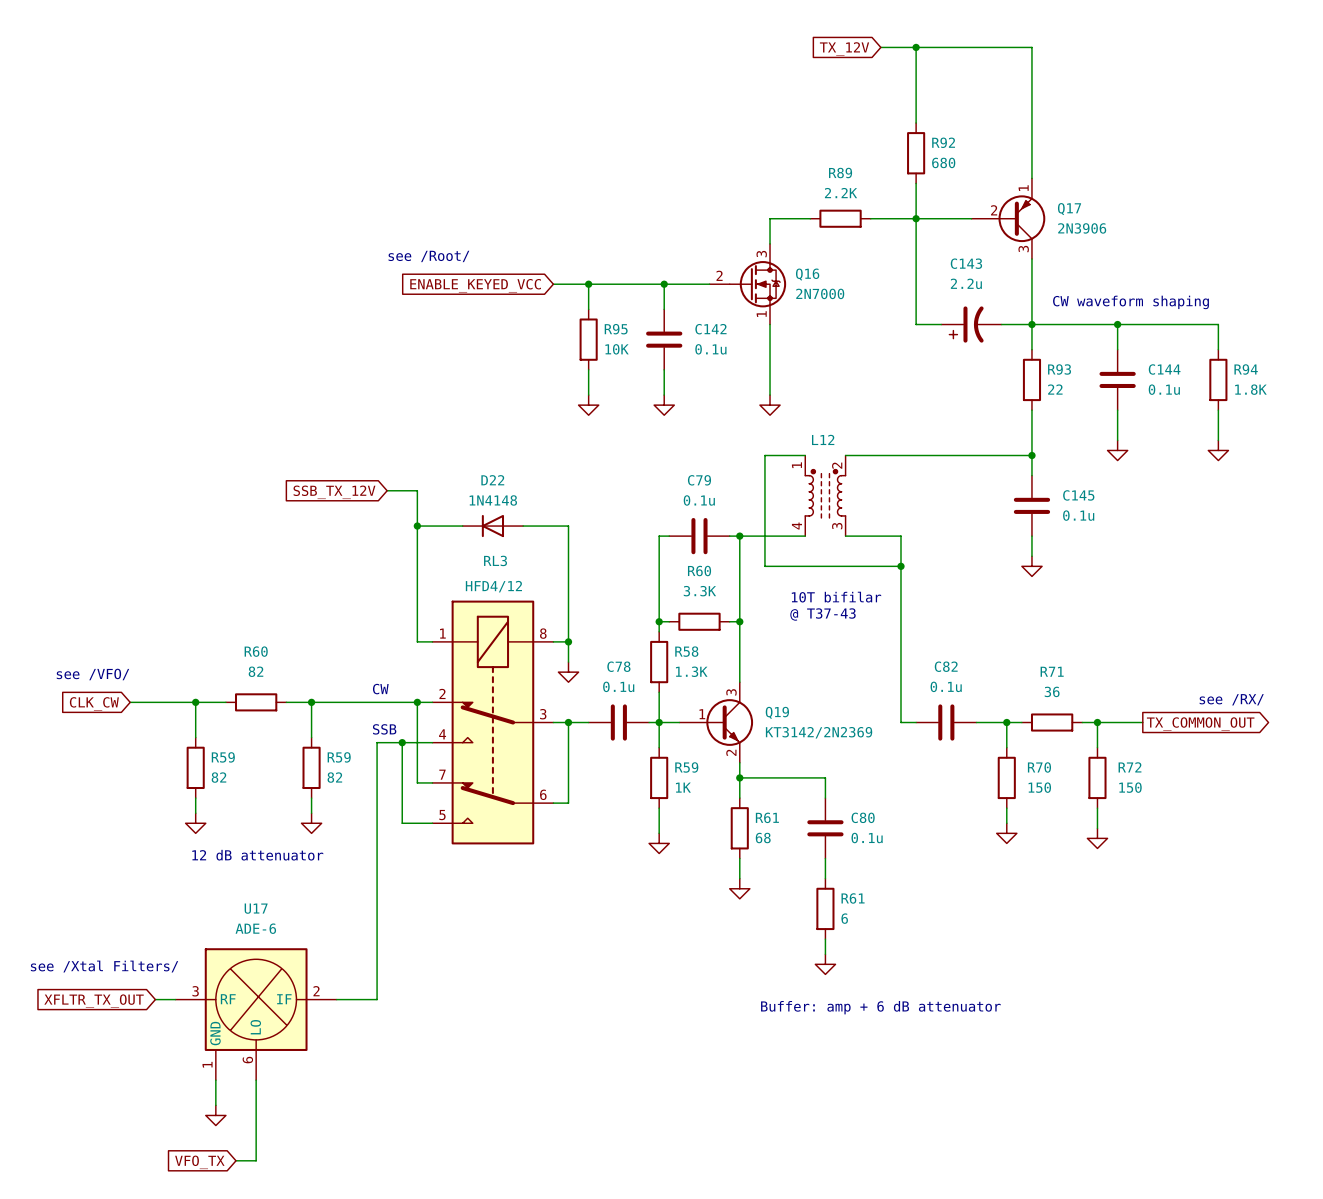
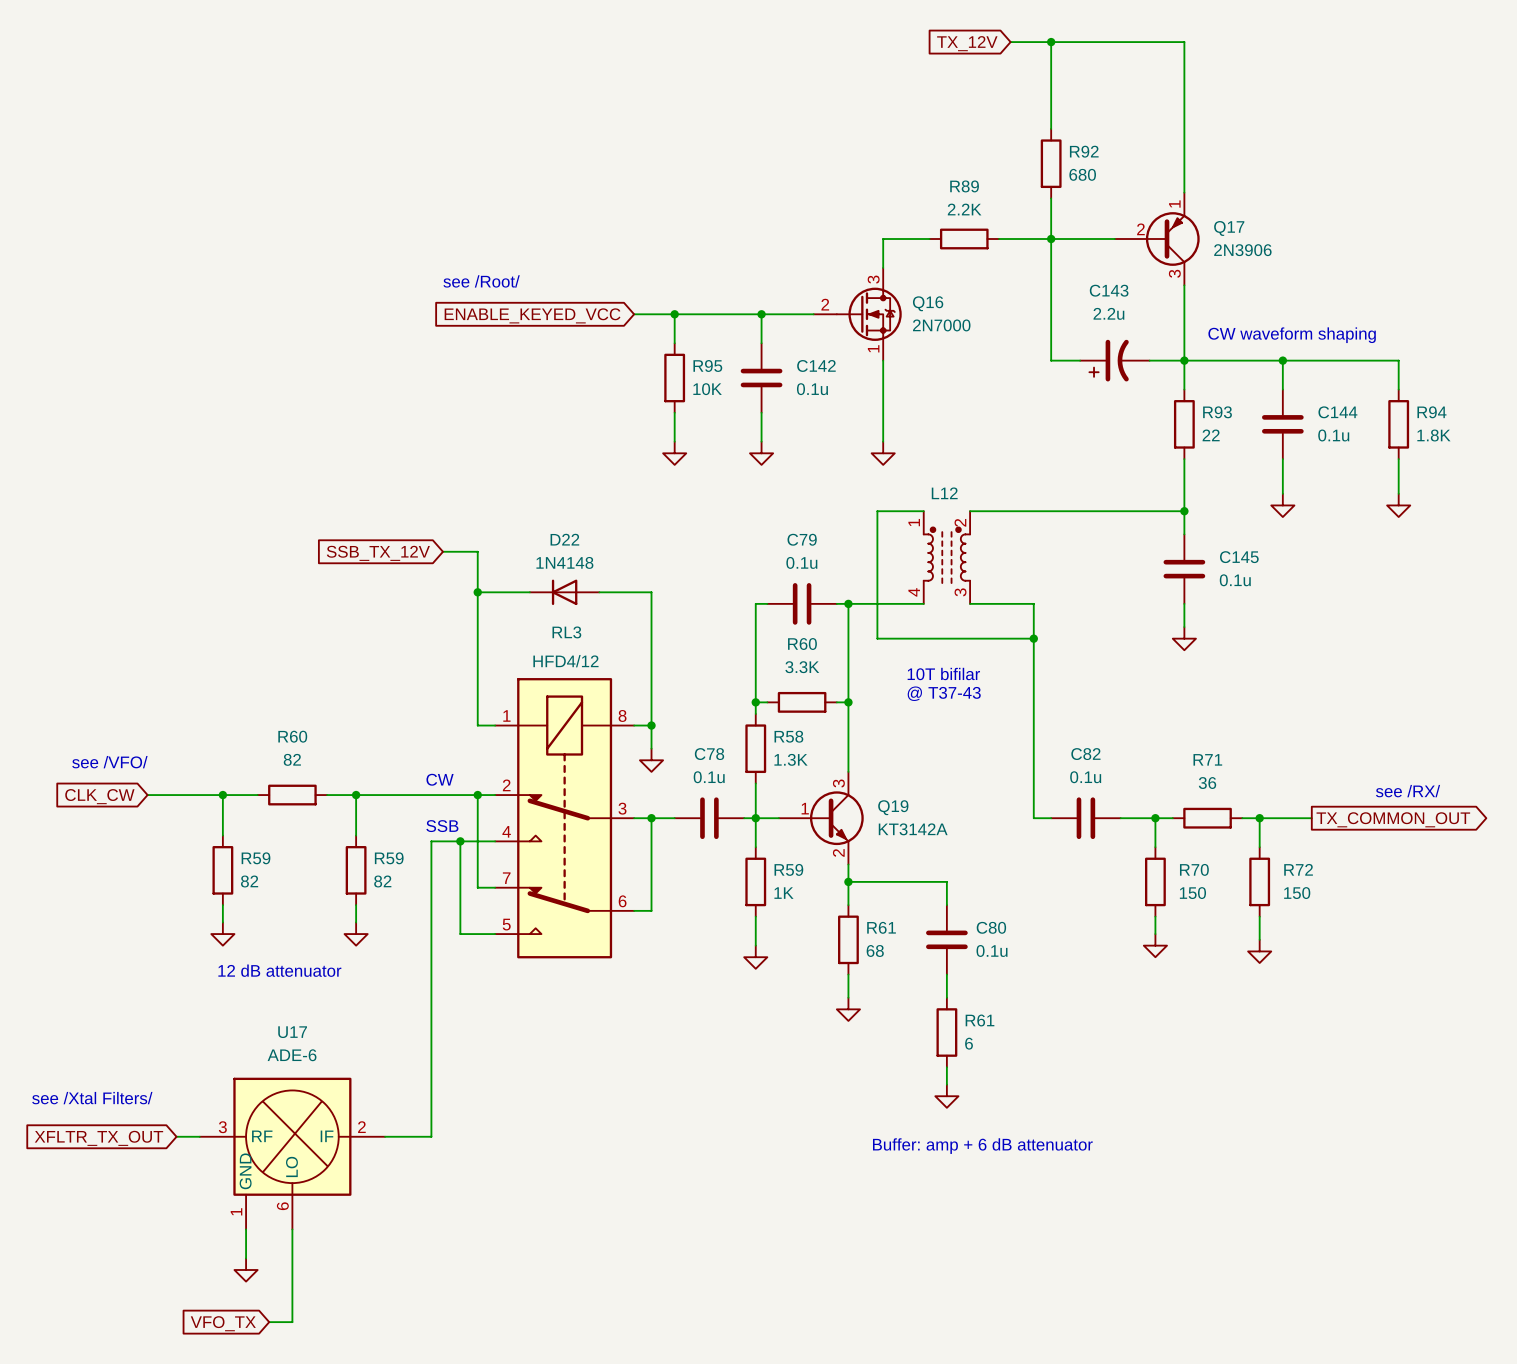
Q19 value: KT3142/2N2369 (819, 732) -> KT3142A (913, 829)

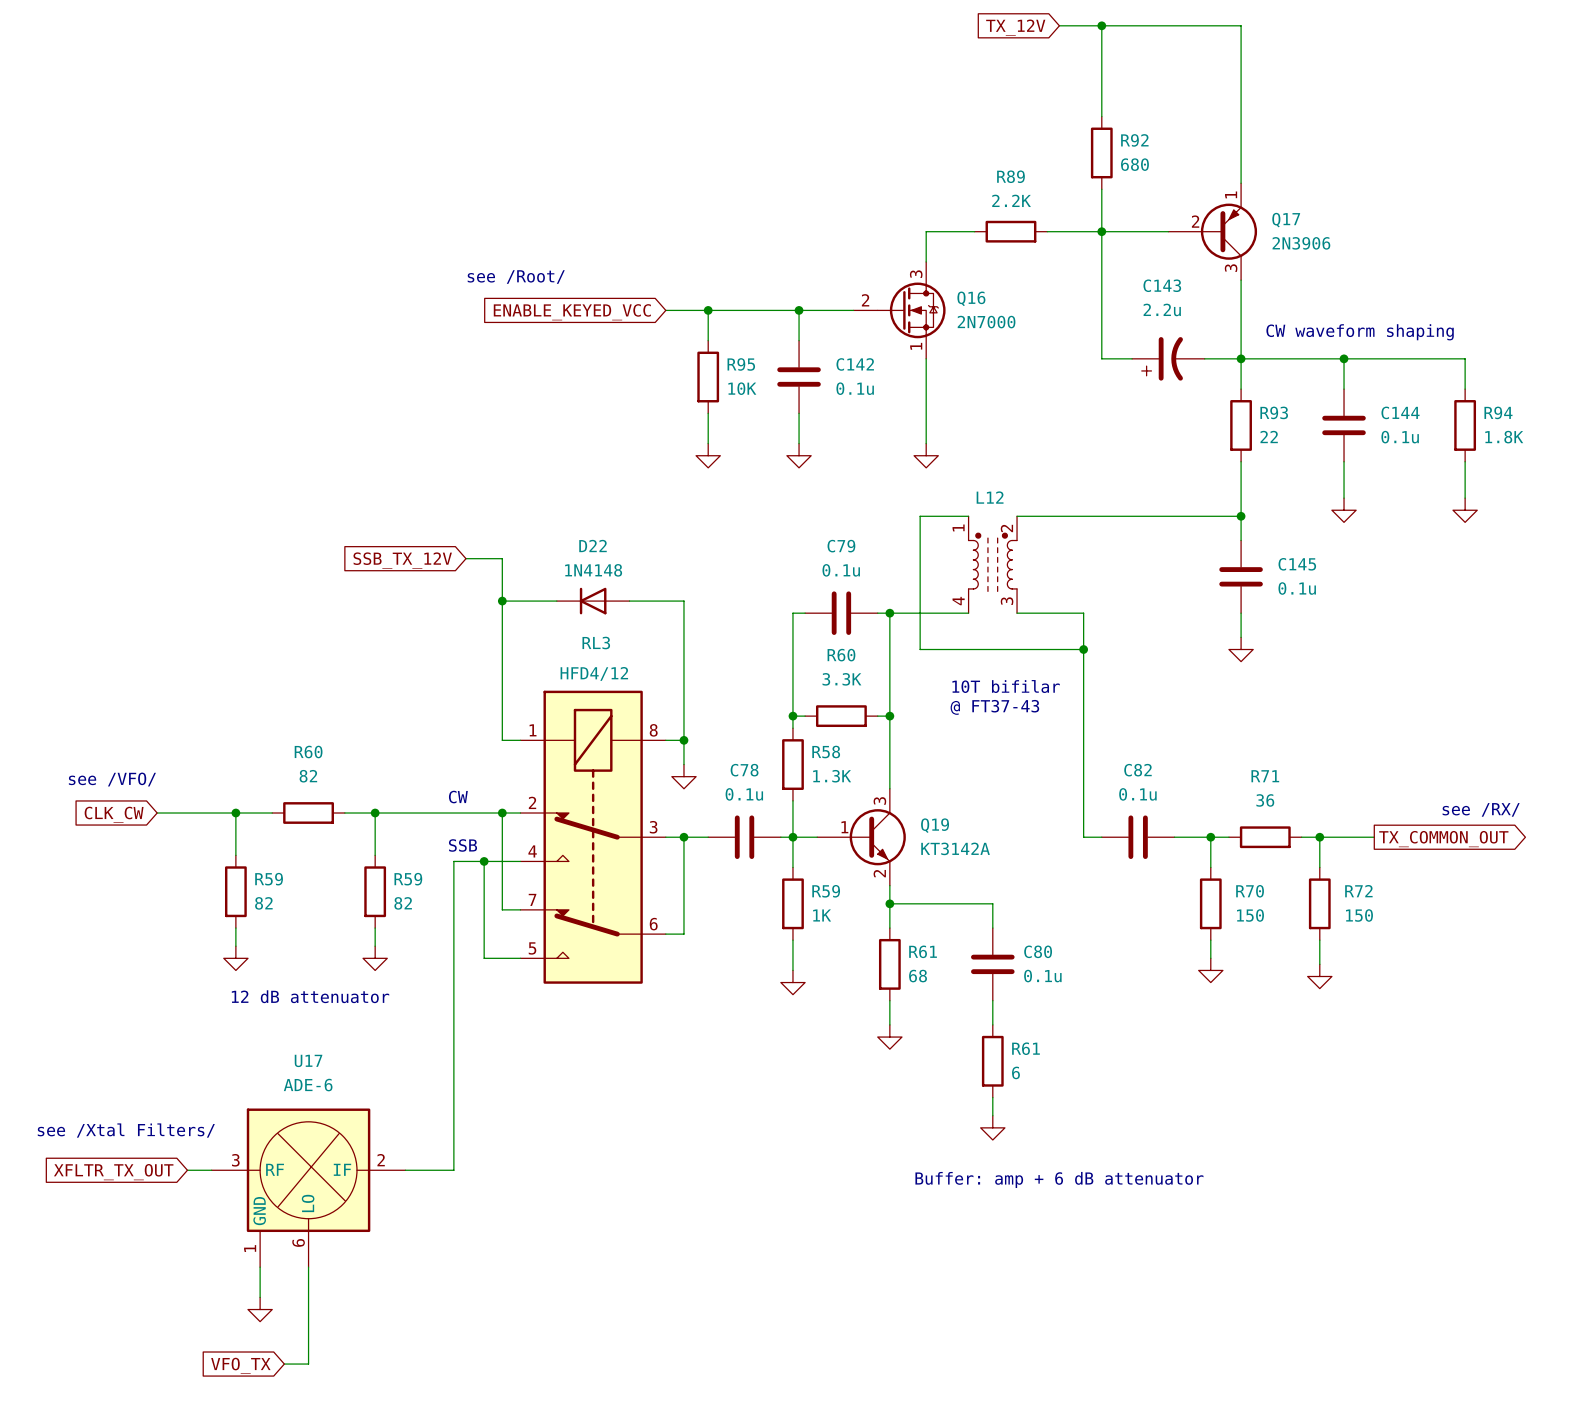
text: @ T37-43 (944, 693) -> @ FT37-43 (994, 707)

